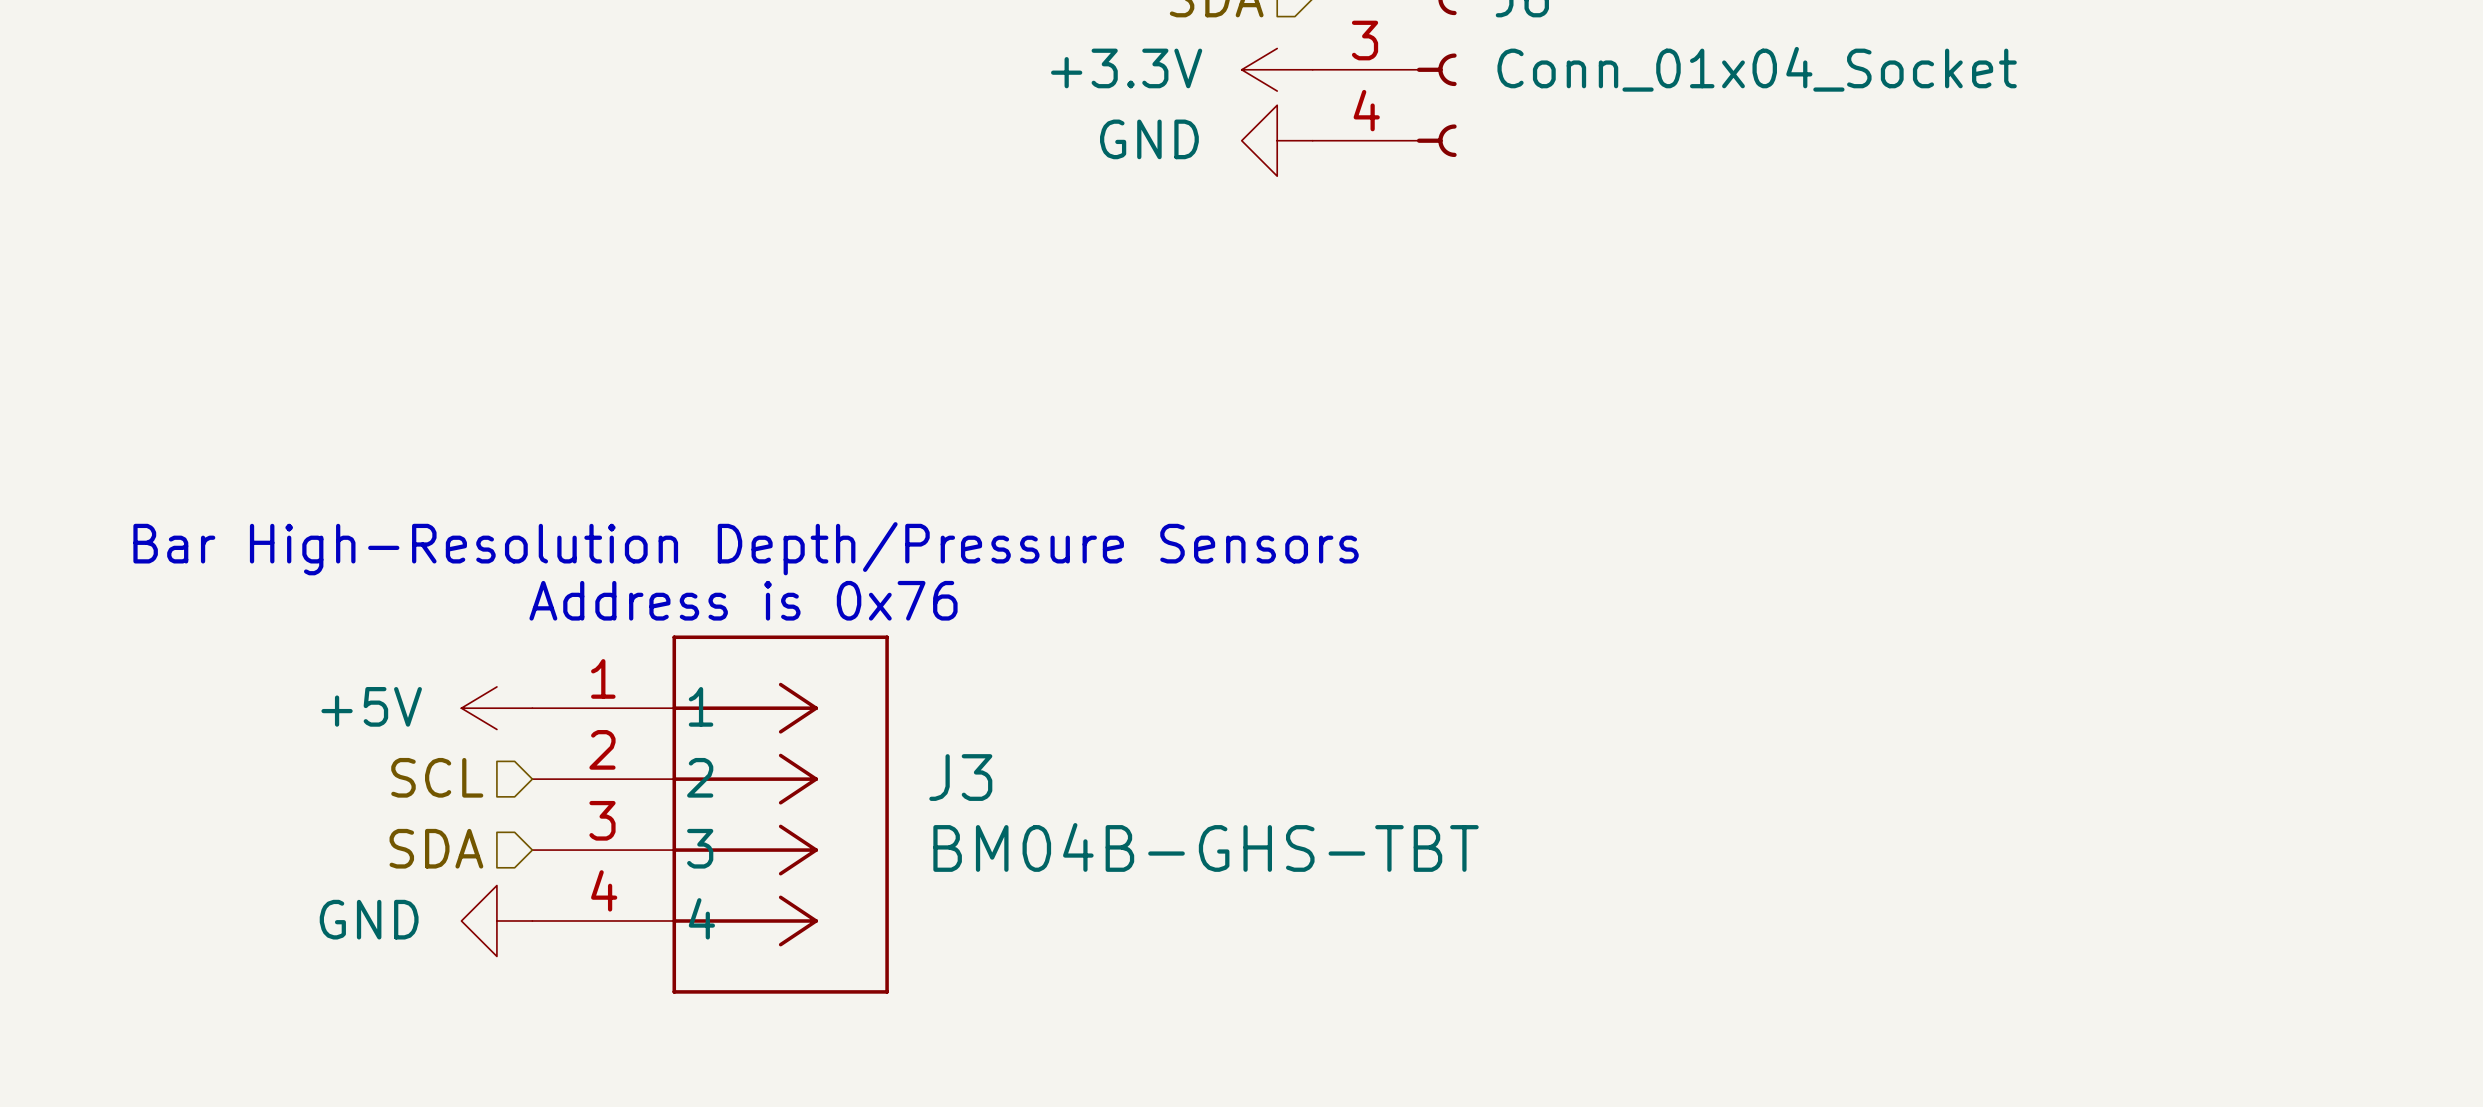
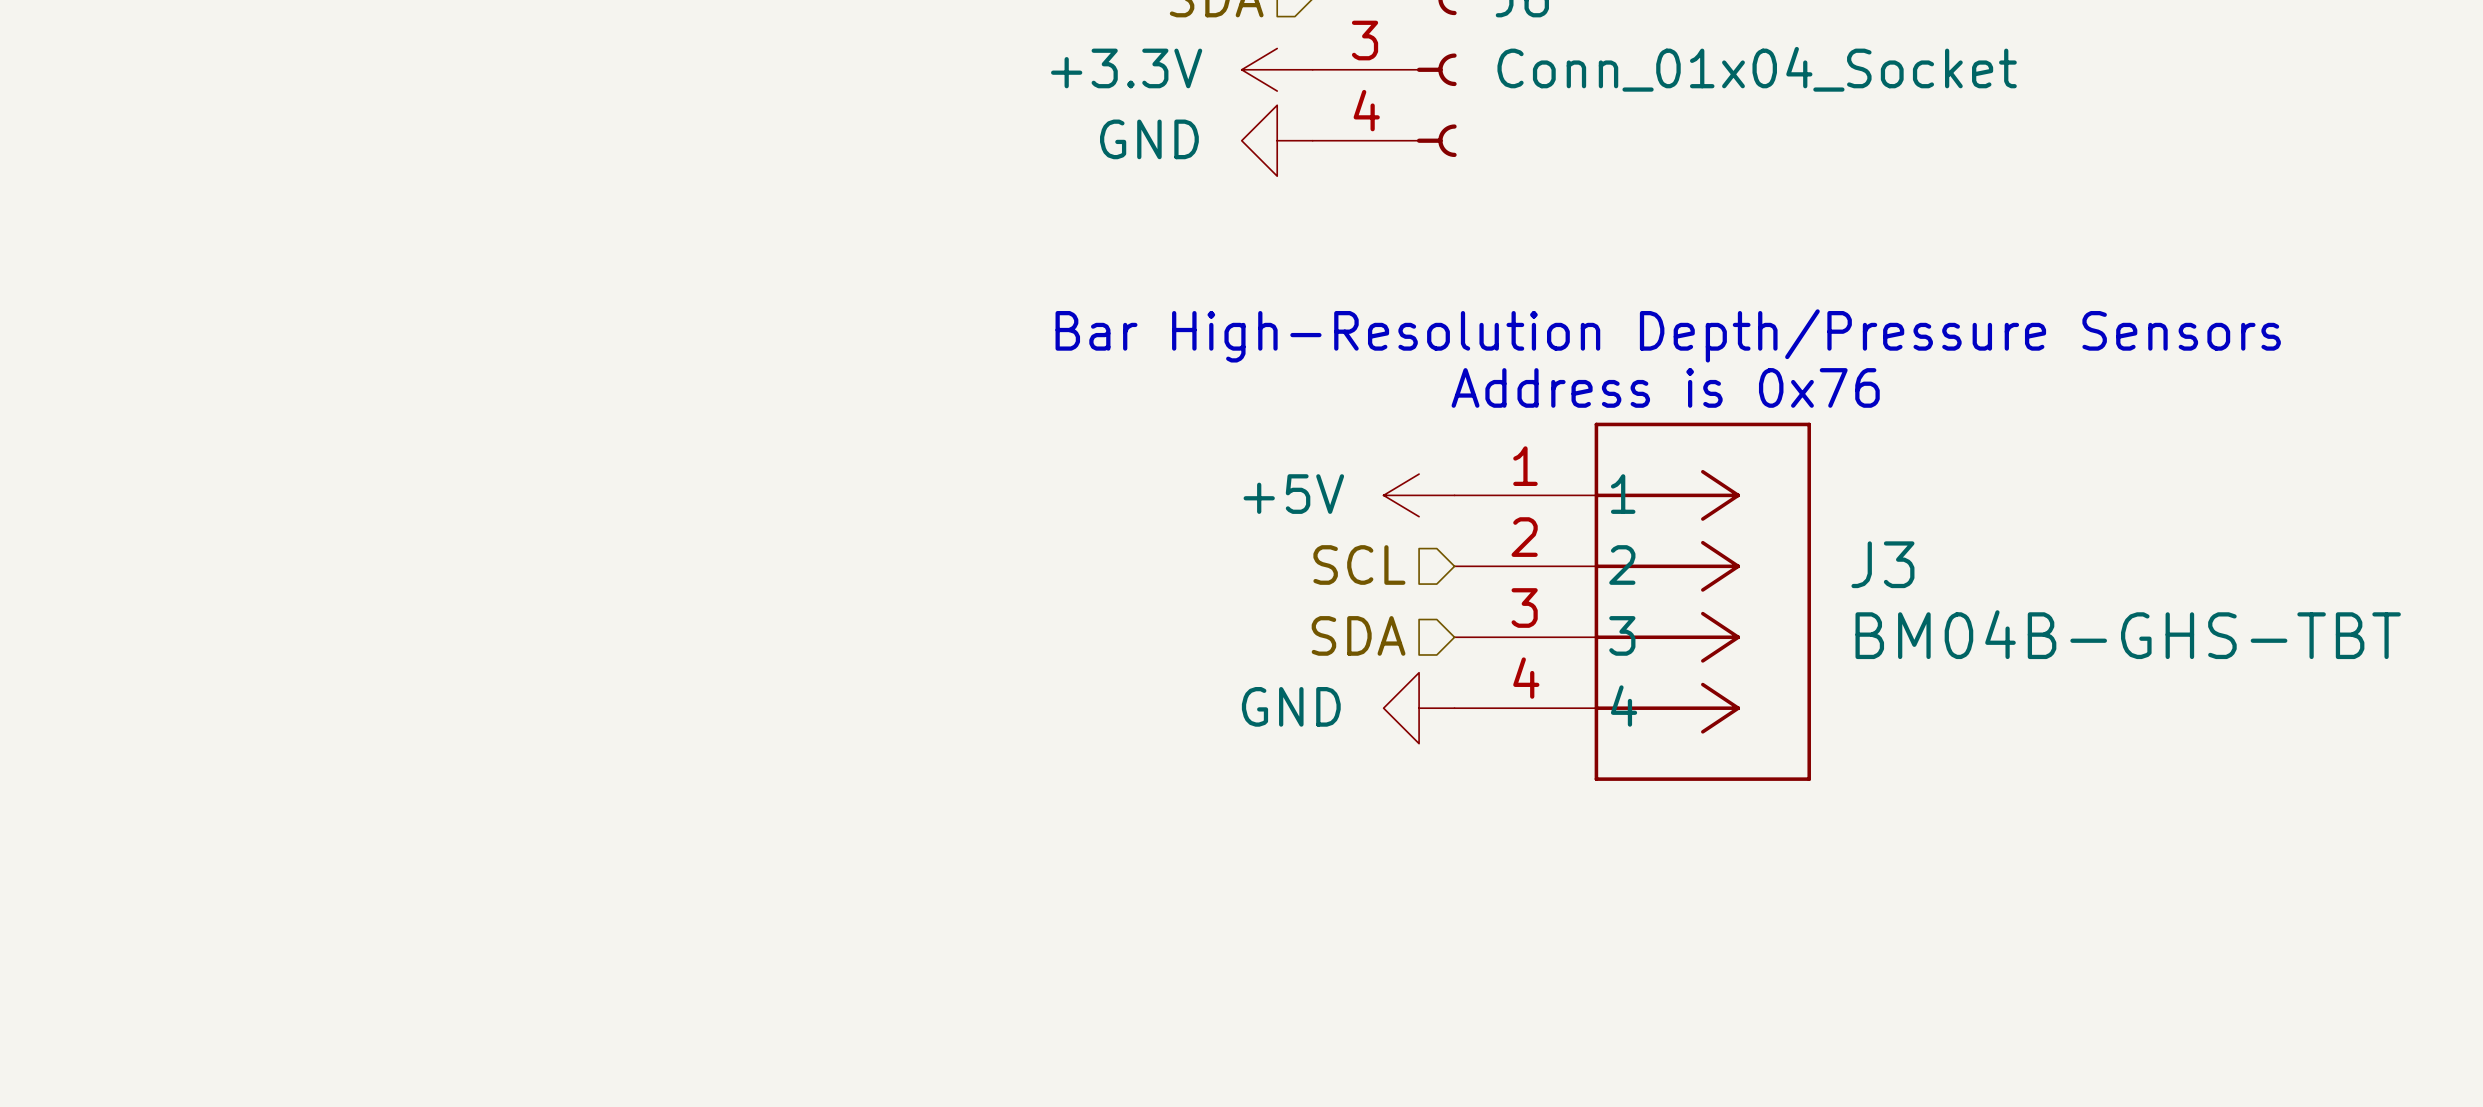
text: none -> Bar High-Resolution Depth/Pressure Sensors (1668, 335)
text: none -> Address is 0x76 (1665, 387)
power symbol: none -> +5V (1419, 495)
text: Bar High-Resolution Depth/Pressure Sensors (746, 548) -> none
hierarchical label: none -> SCL (1359, 564)
text: Address is 0x76 (743, 600) -> none
hierarchical label: none -> SDA (1358, 635)
power symbol: +5V (496, 708) -> none
power symbol: none -> GND (1419, 708)
hierarchical label: SCL (437, 777) -> none
J3 position: (710, 814) -> (1632, 601)
hierarchical label: SDA (436, 848) -> none
power symbol: GND (496, 920) -> none

